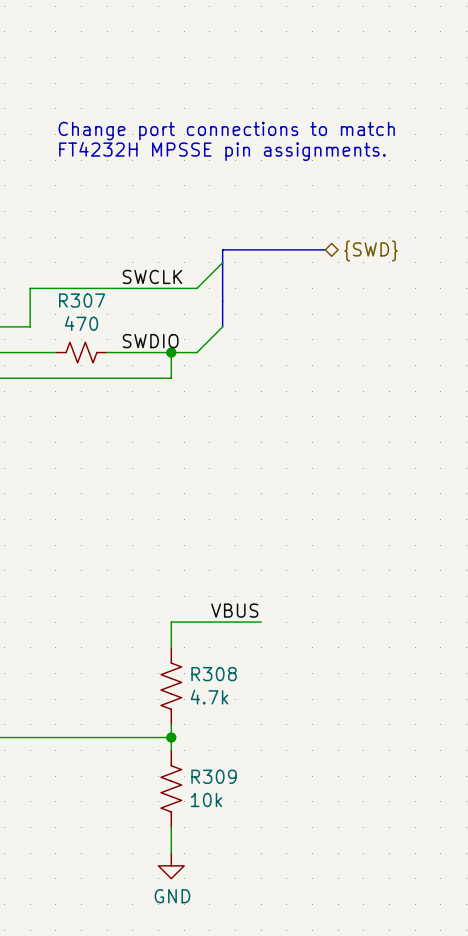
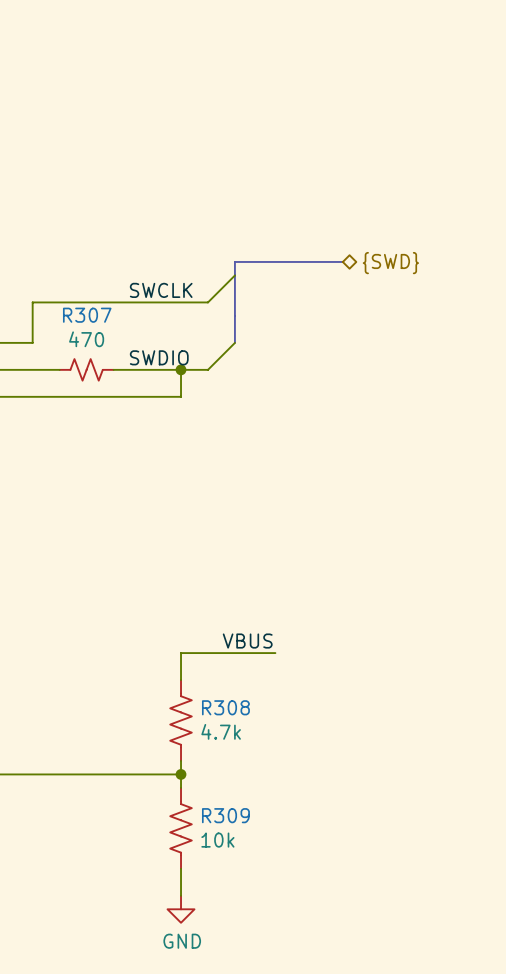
text: Change port connections to match (226, 131) -> none
text: FT4232H MPSSE pin assignments. (222, 151) -> none

